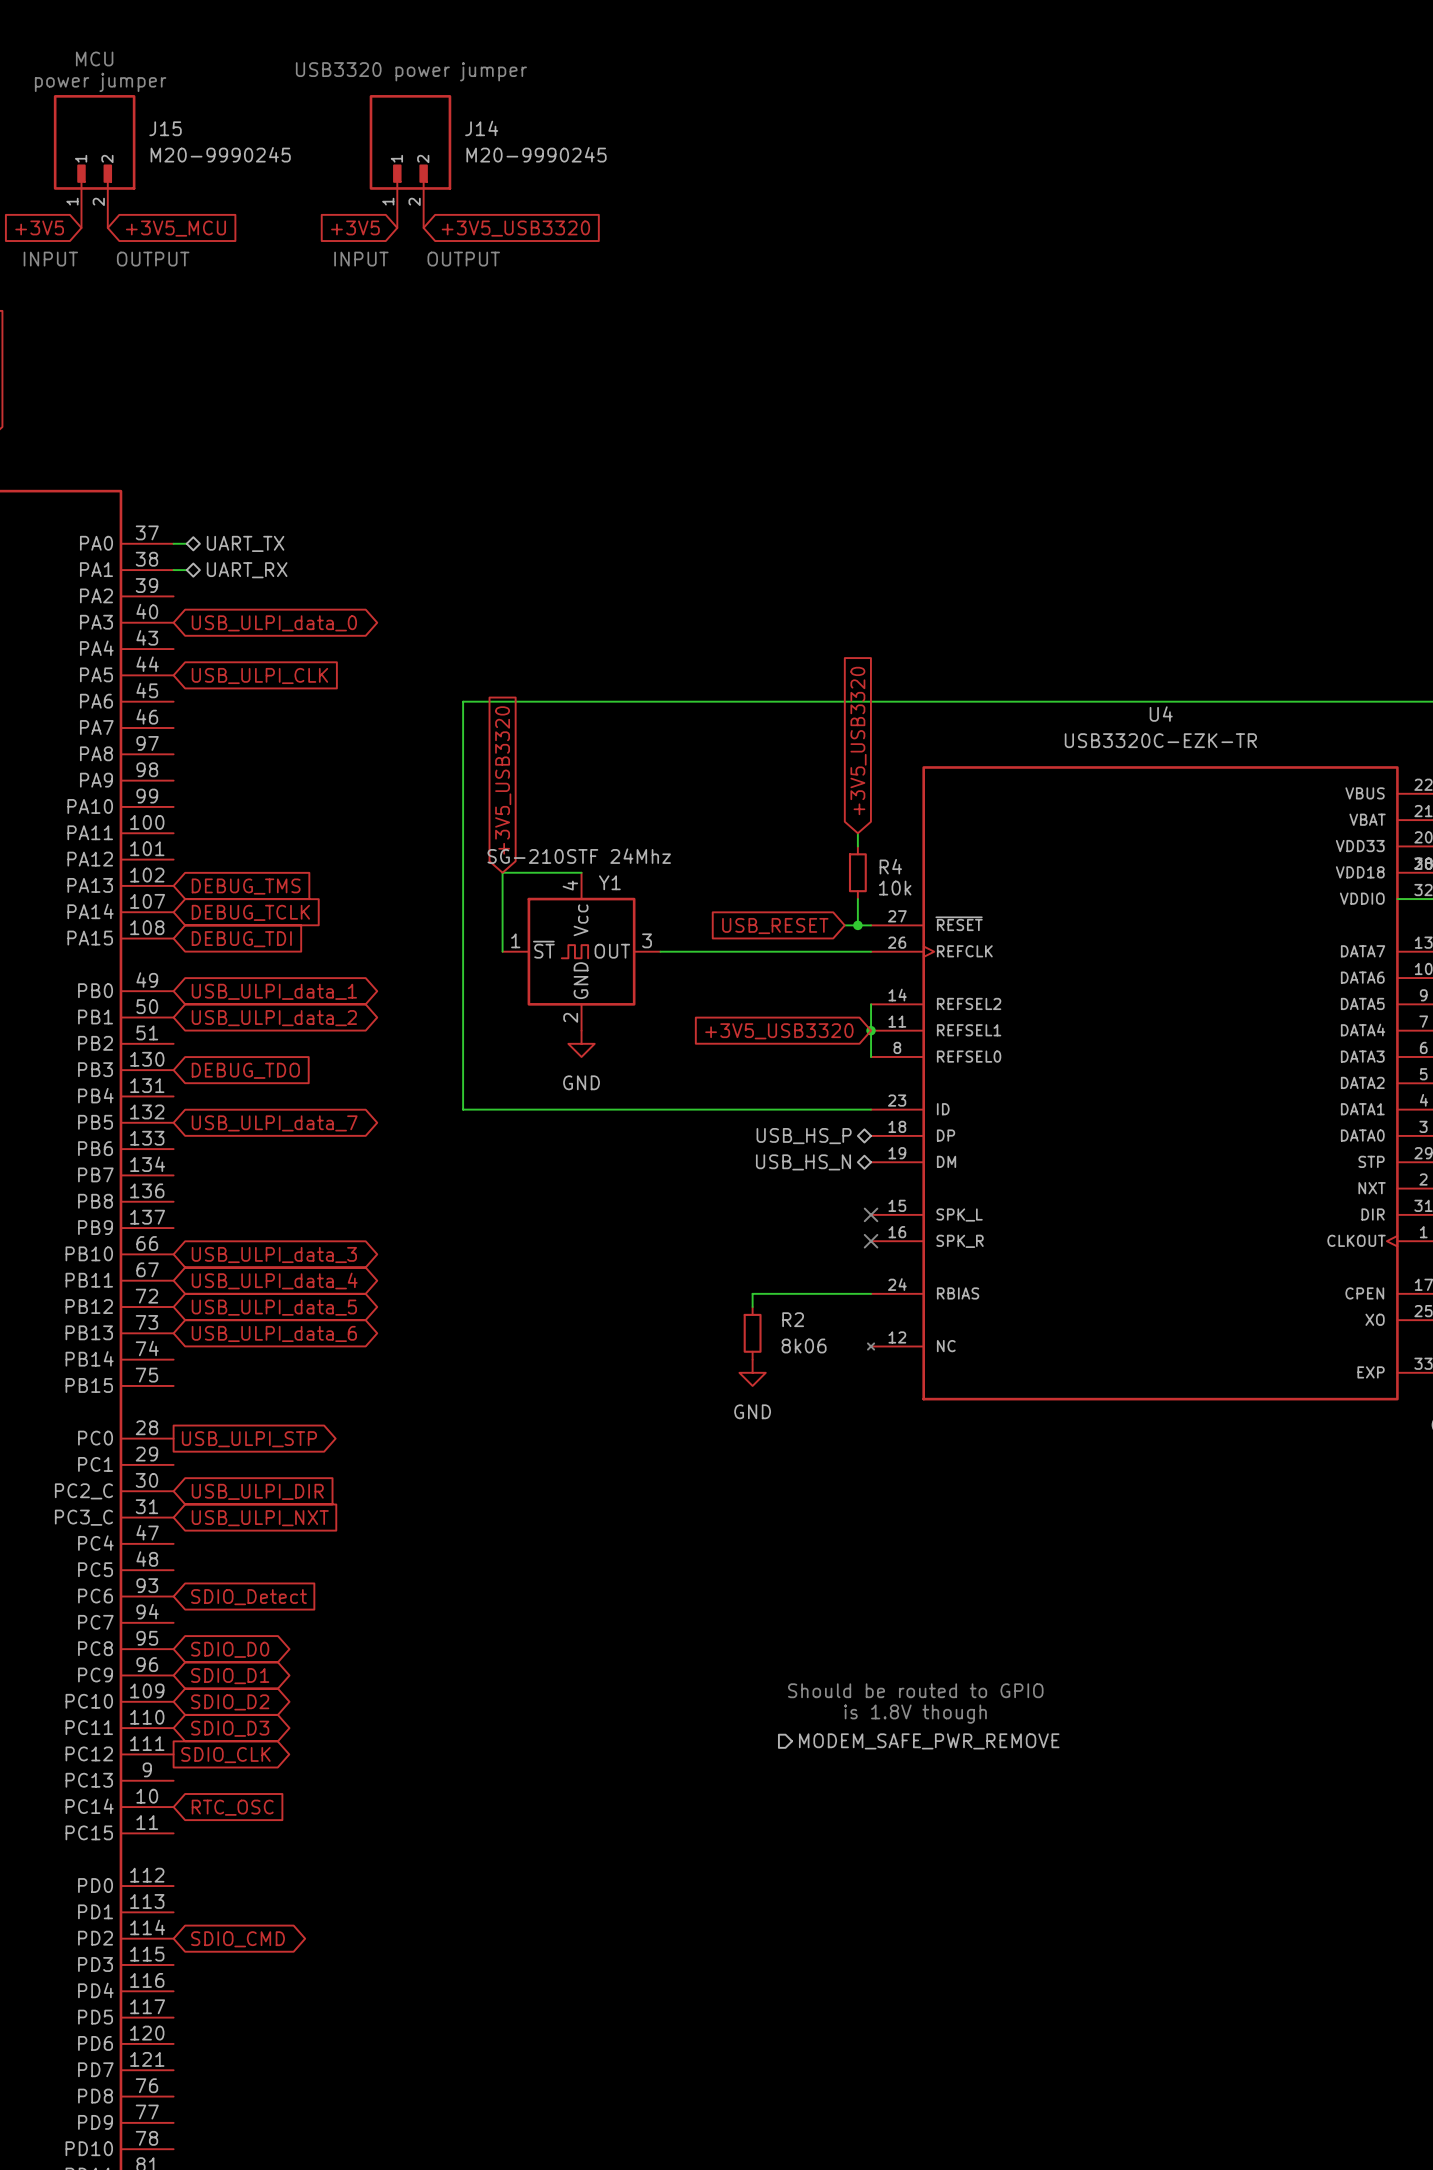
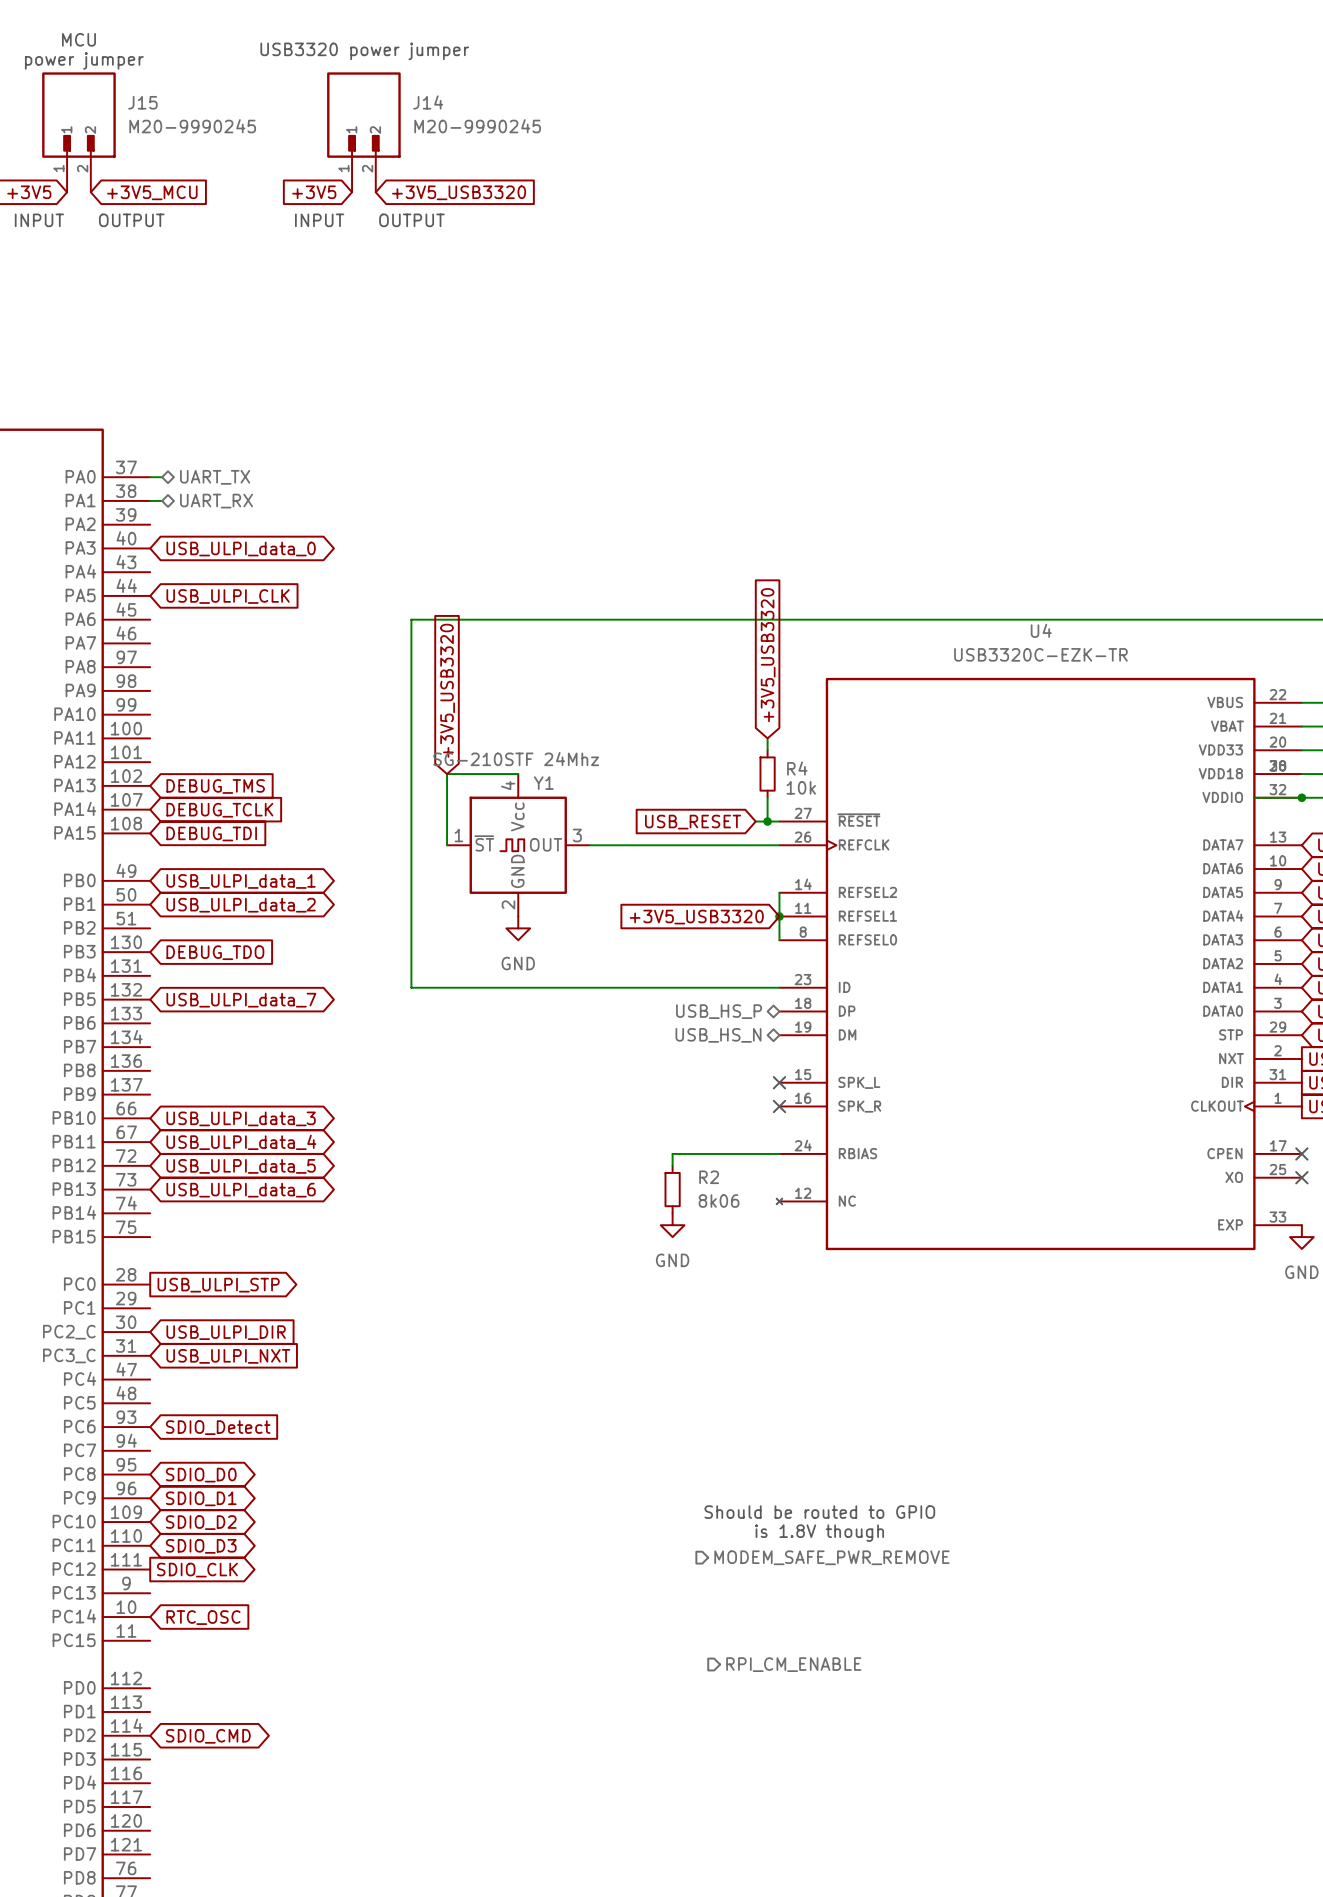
hierarchical label: none -> RPI_CM_ENABLE (793, 1664)

